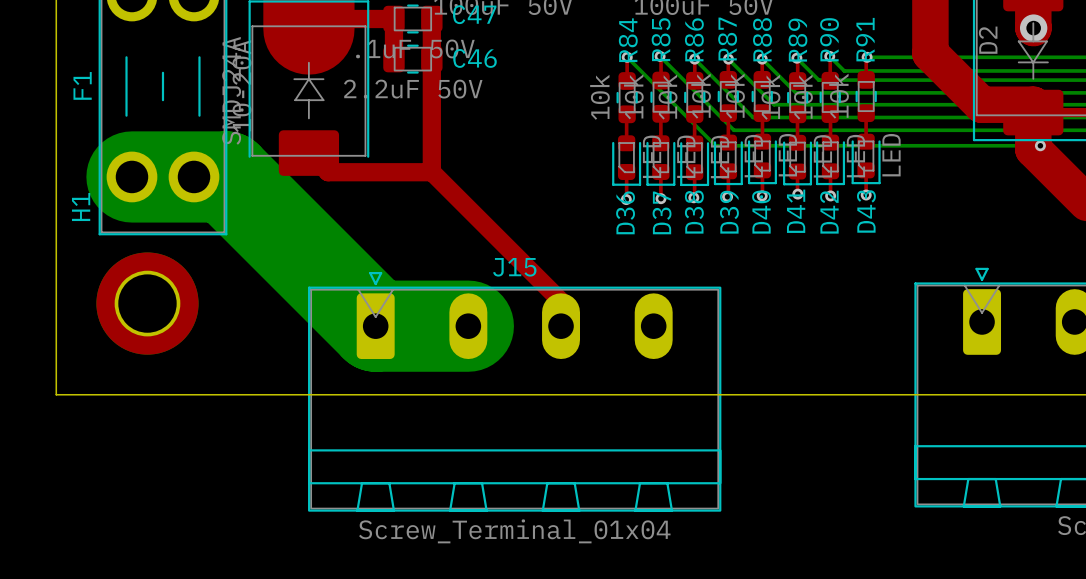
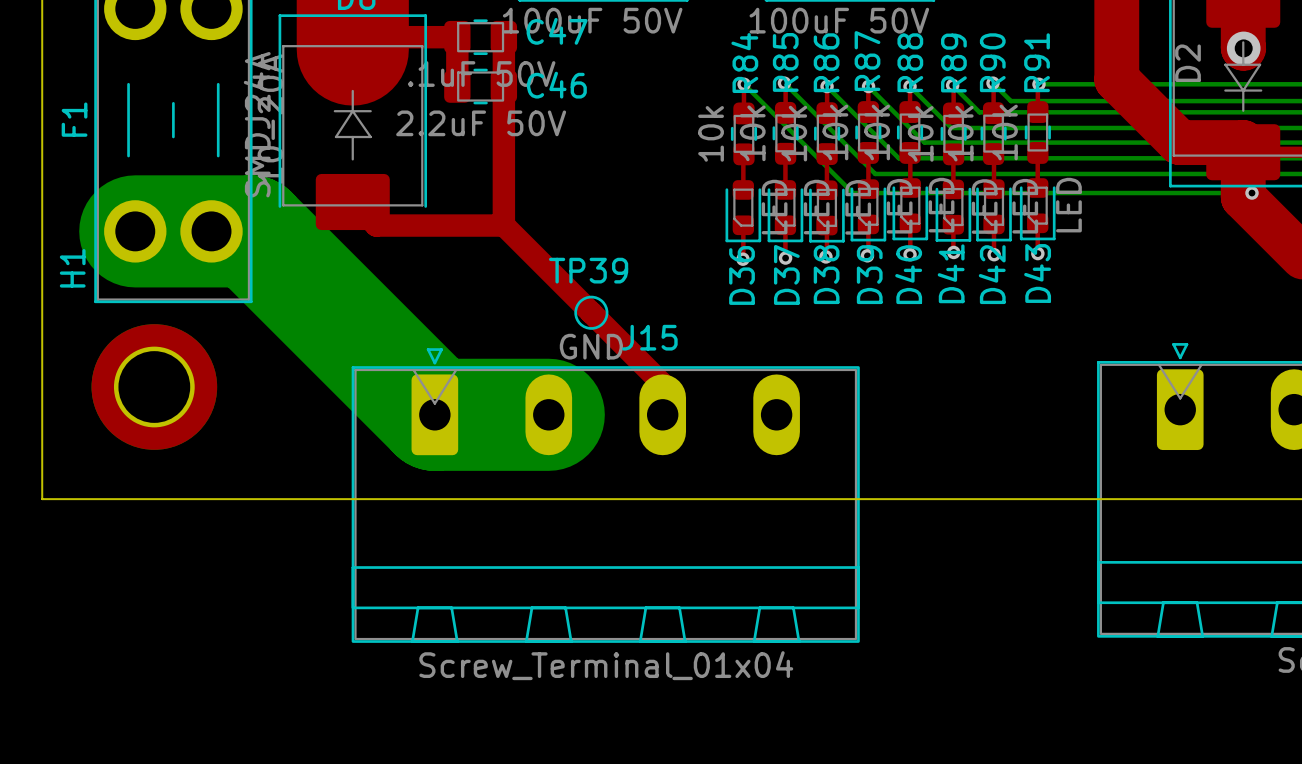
TP39: none -> GND (591, 312)
J15 name position: J15 (514, 267) -> J15 (649, 337)

